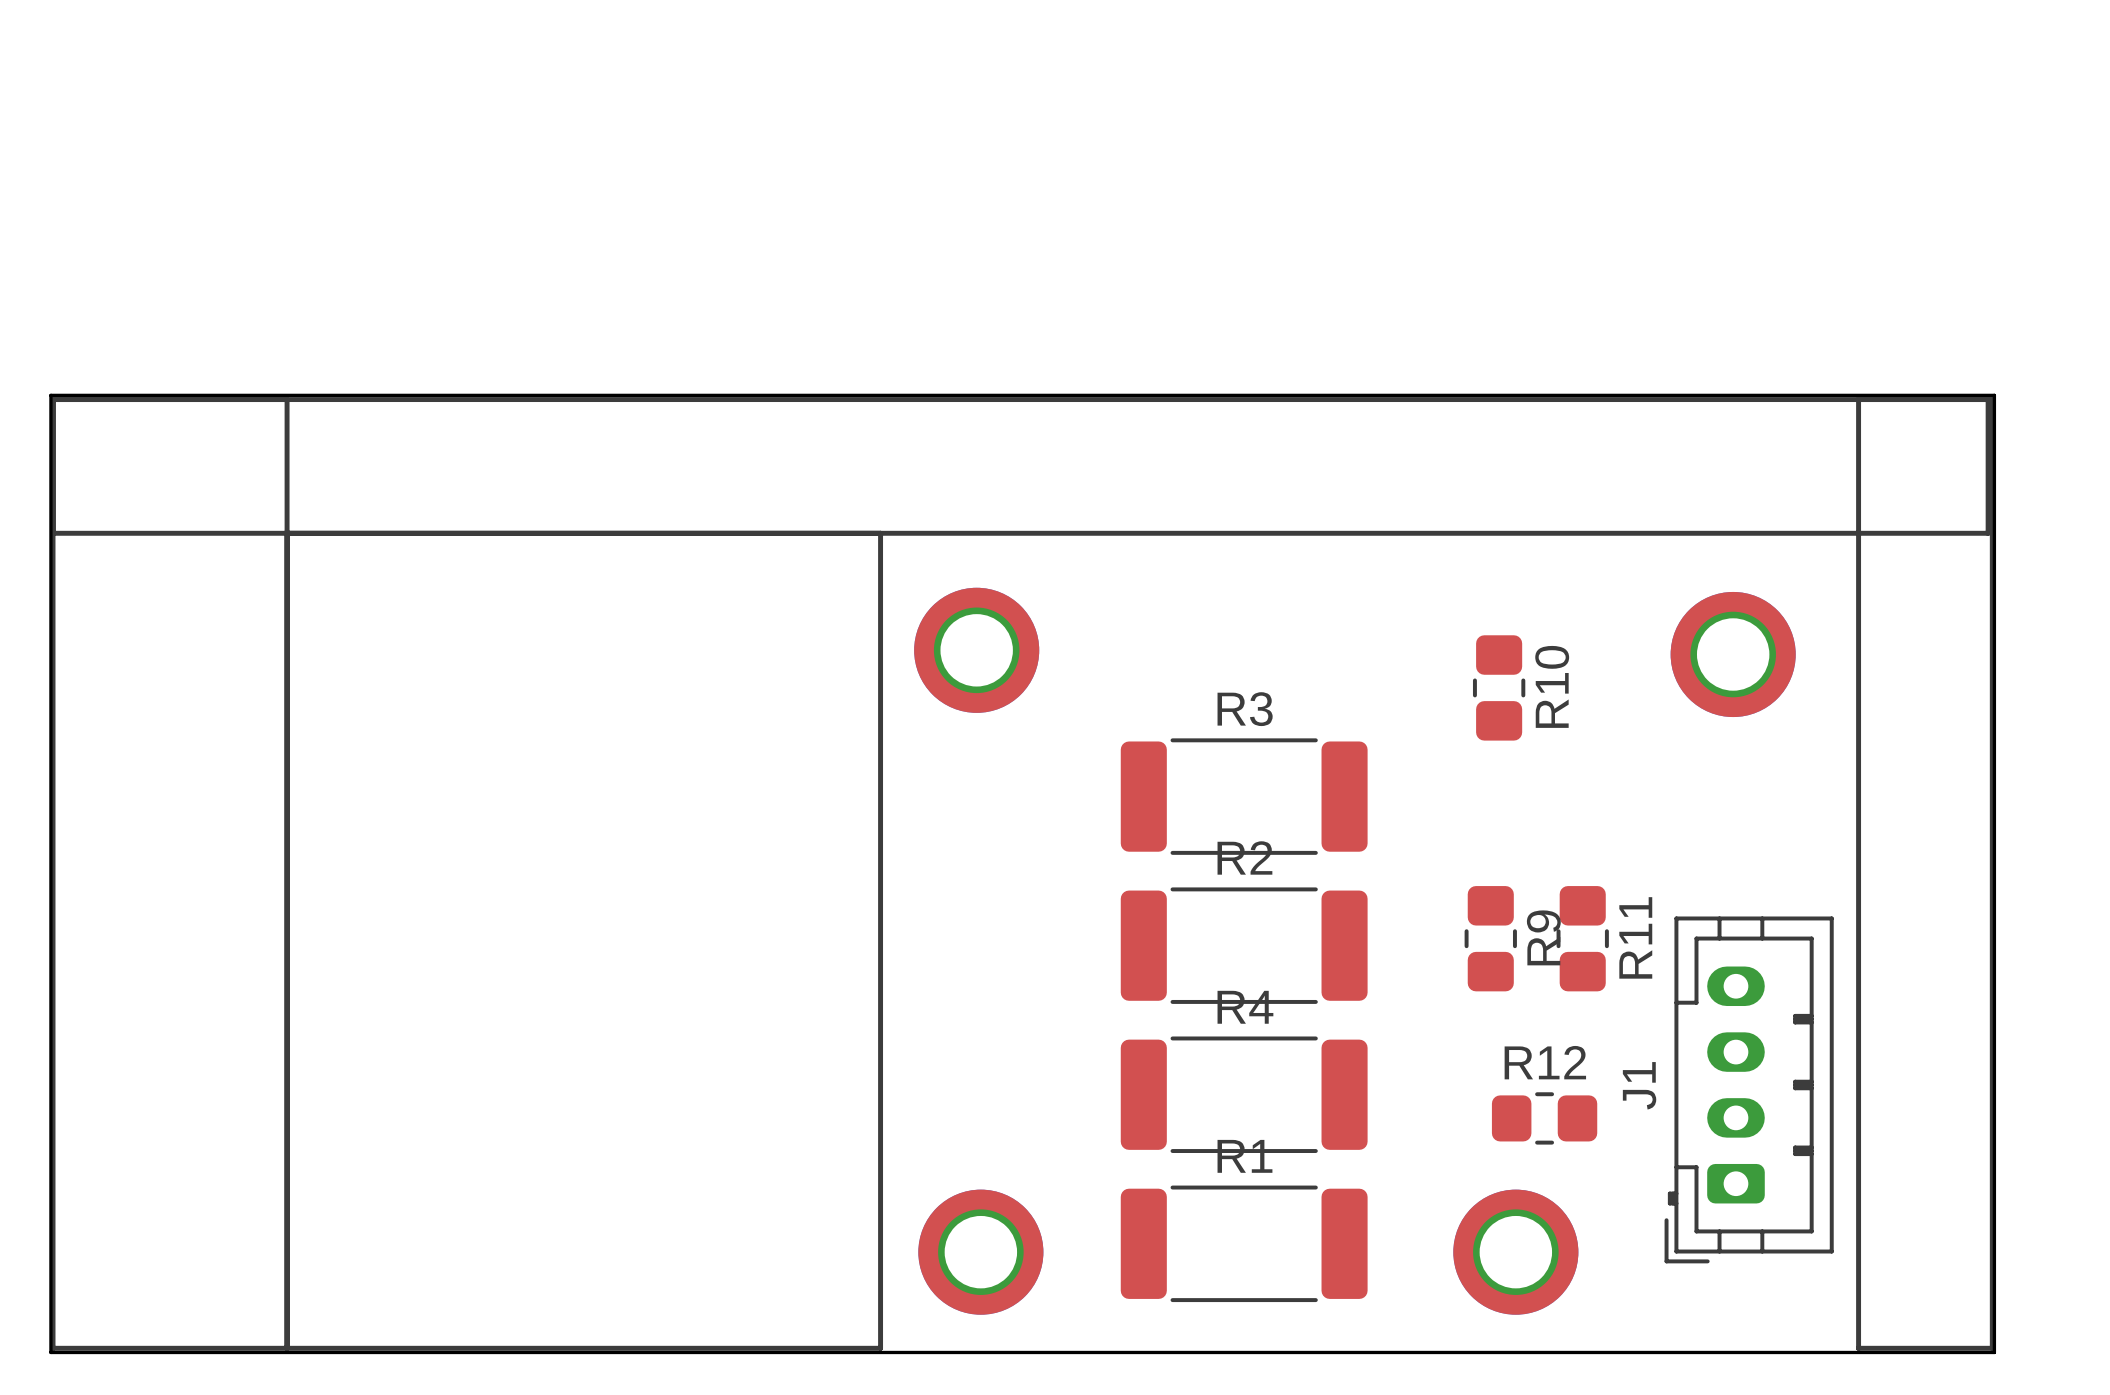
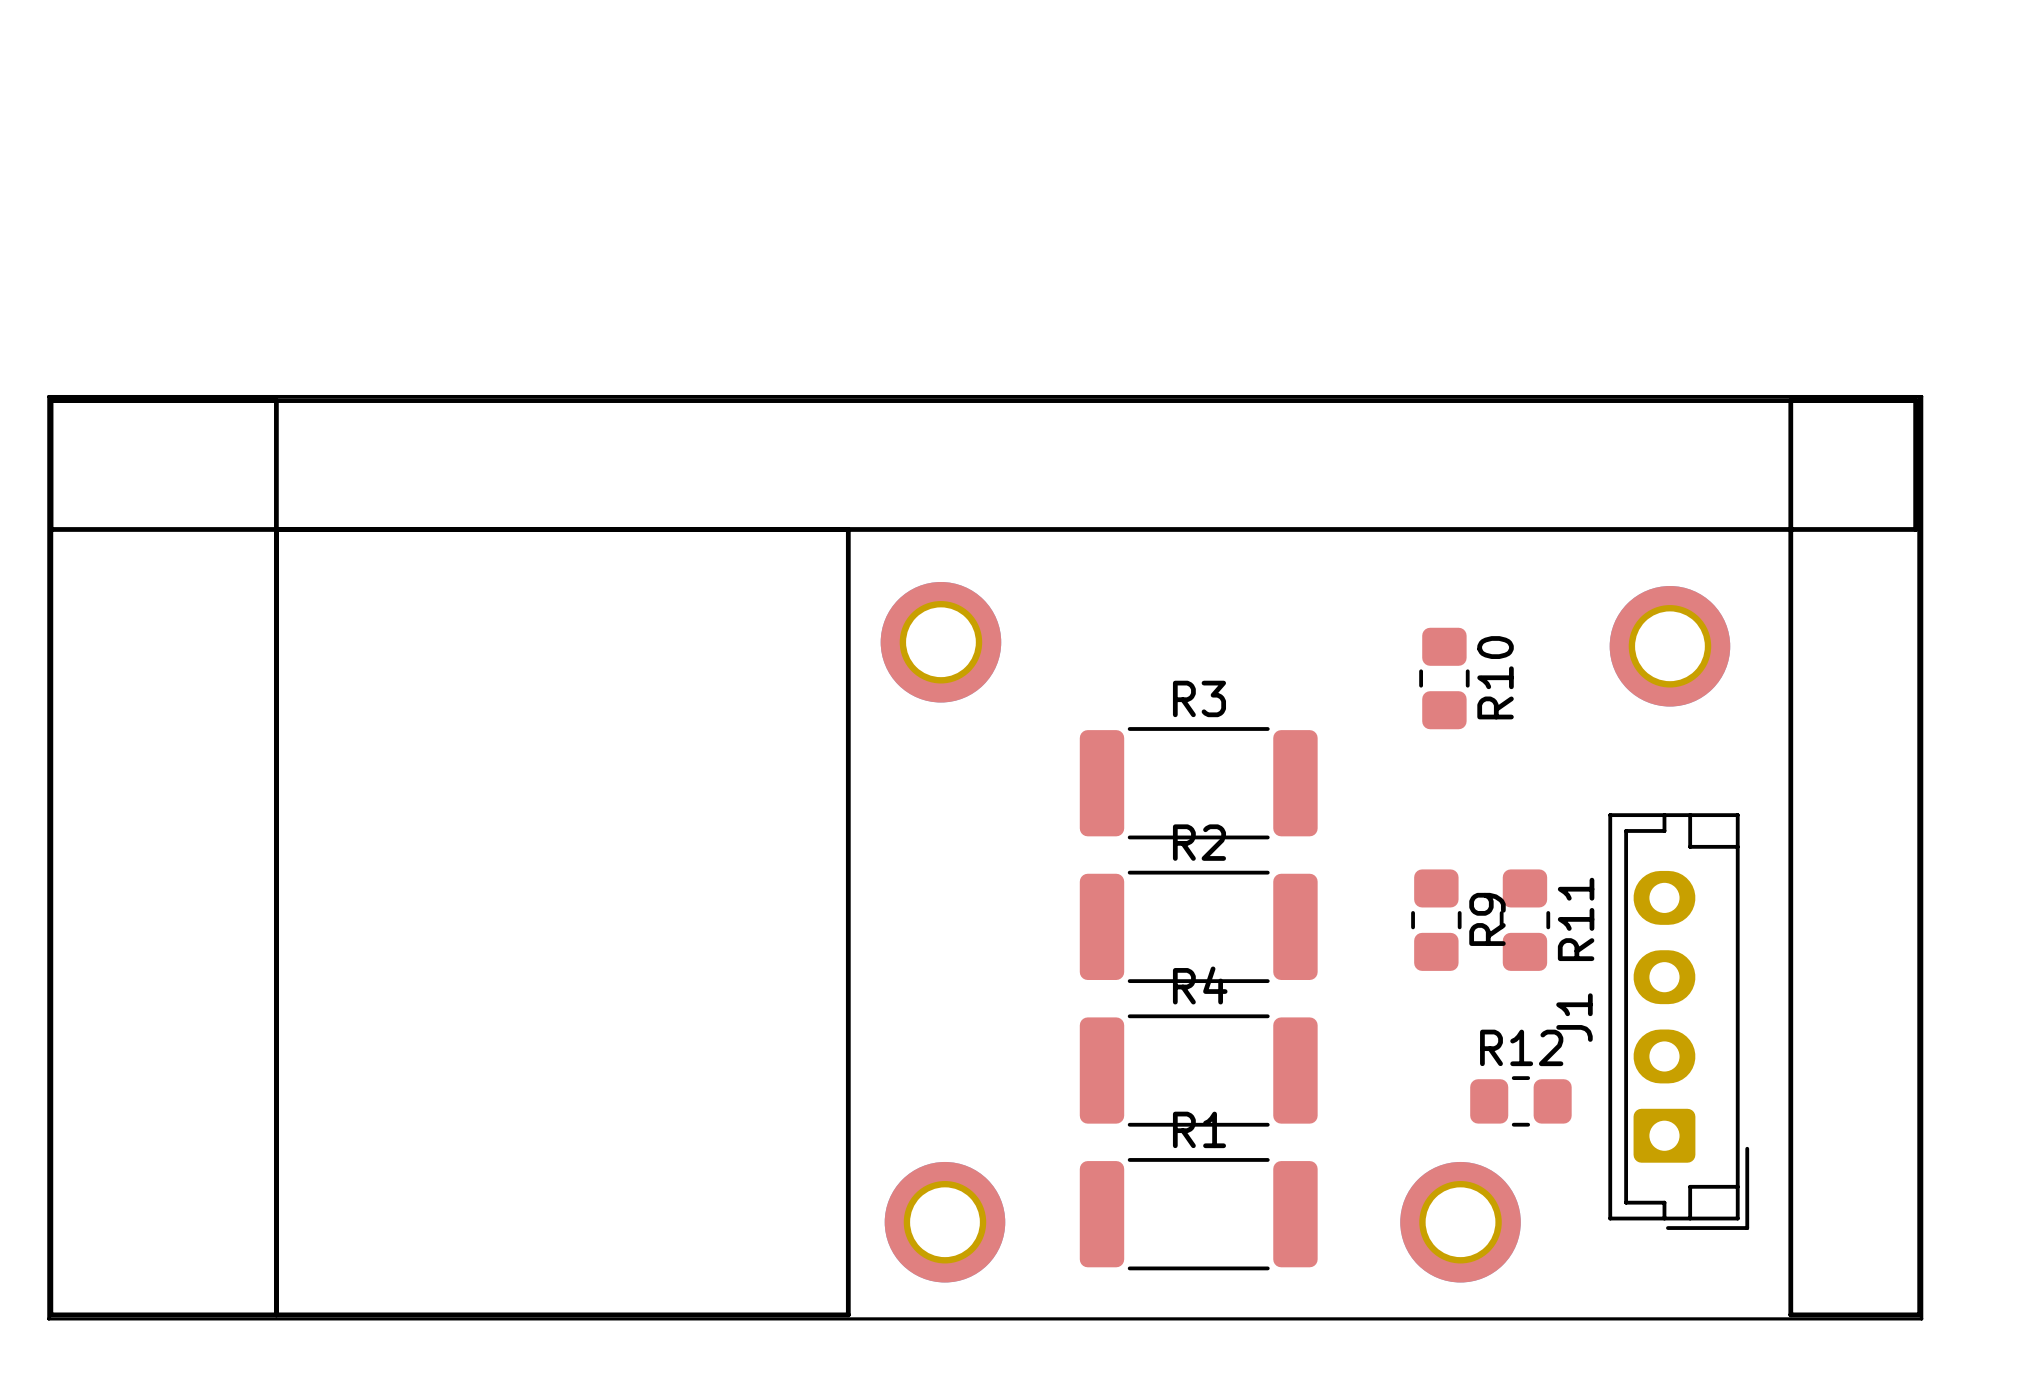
J1 footprint: [1664, 916, 1834, 1264] -> [1608, 813, 1750, 1230]
R12 position: (1544, 1118) -> (1520, 1101)

